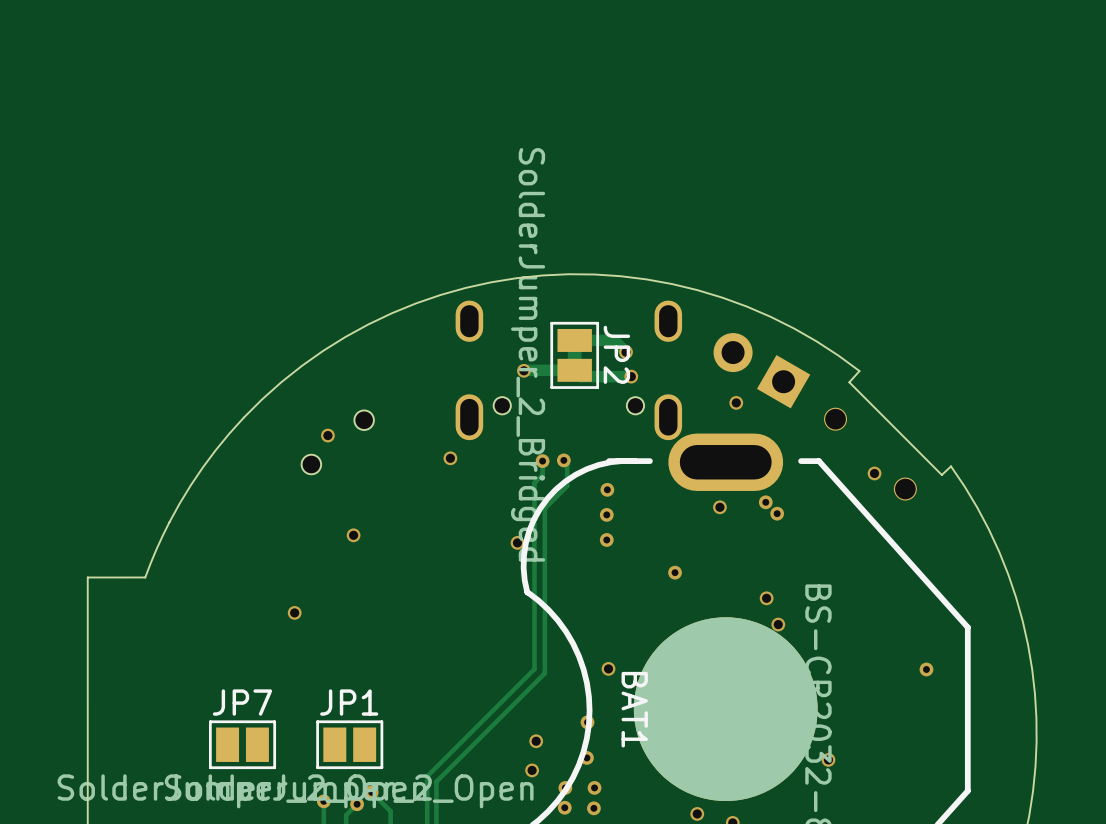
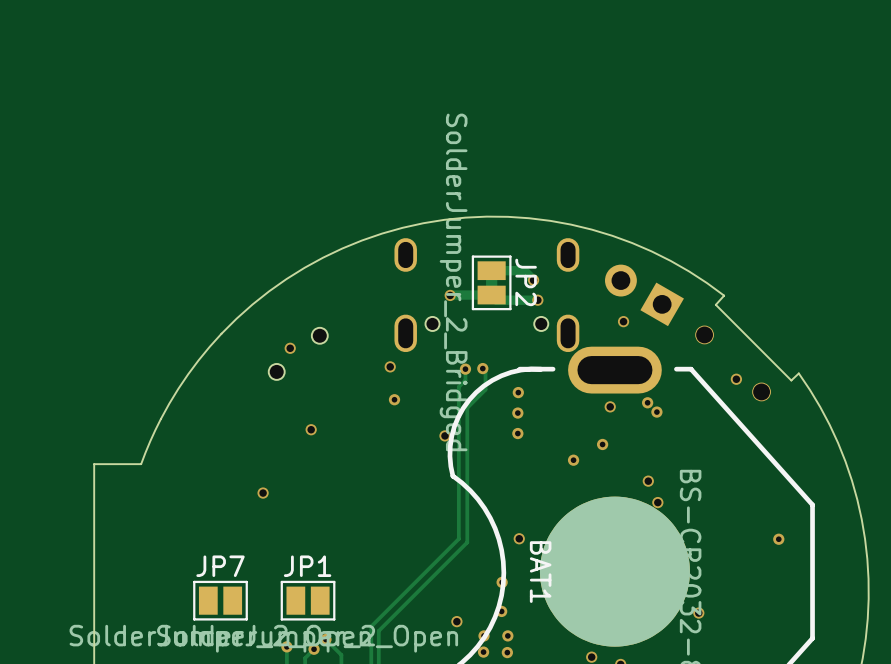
via: none -> (394, 399)
via: none -> (602, 444)
via: (536, 741) -> none

